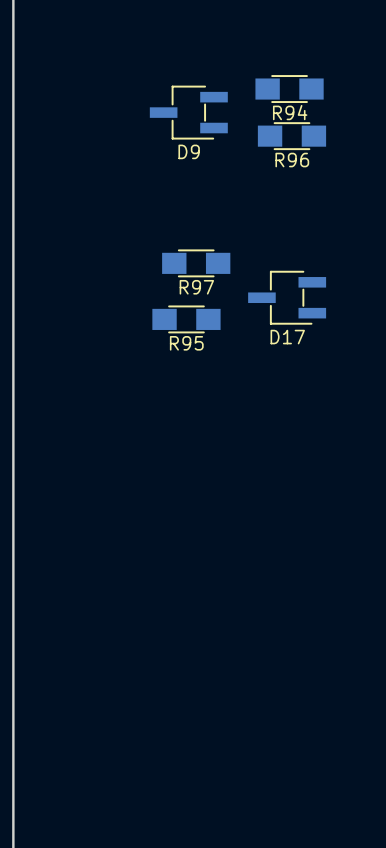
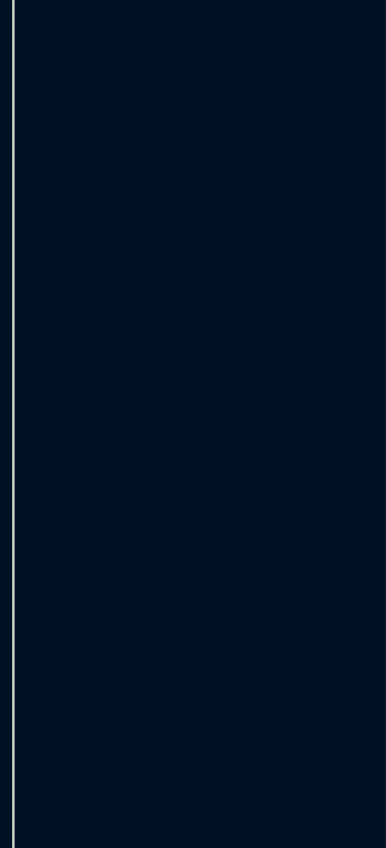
R94: (289, 89) -> none
D9: (188, 112) -> none
R96: (291, 136) -> none
R97: (196, 263) -> none
D17: (287, 297) -> none
R95: (186, 319) -> none

